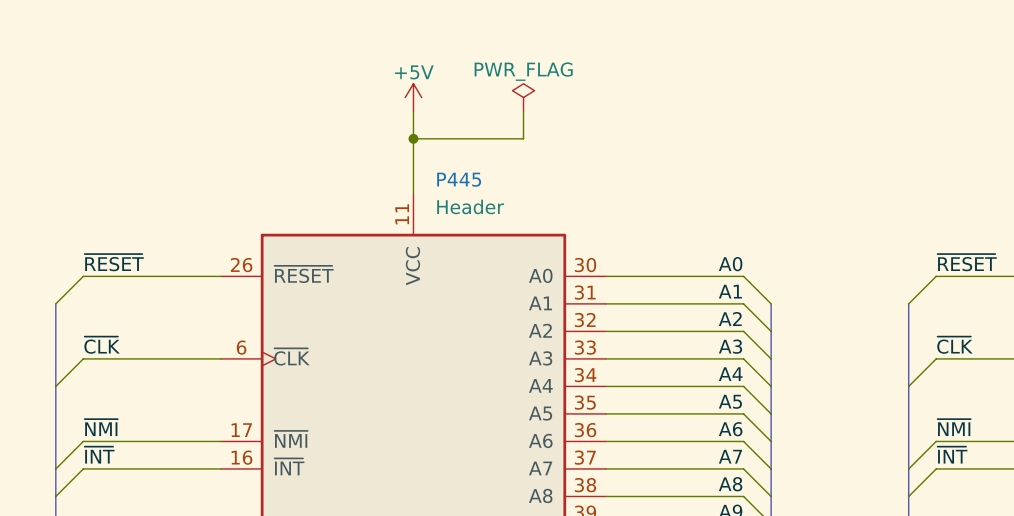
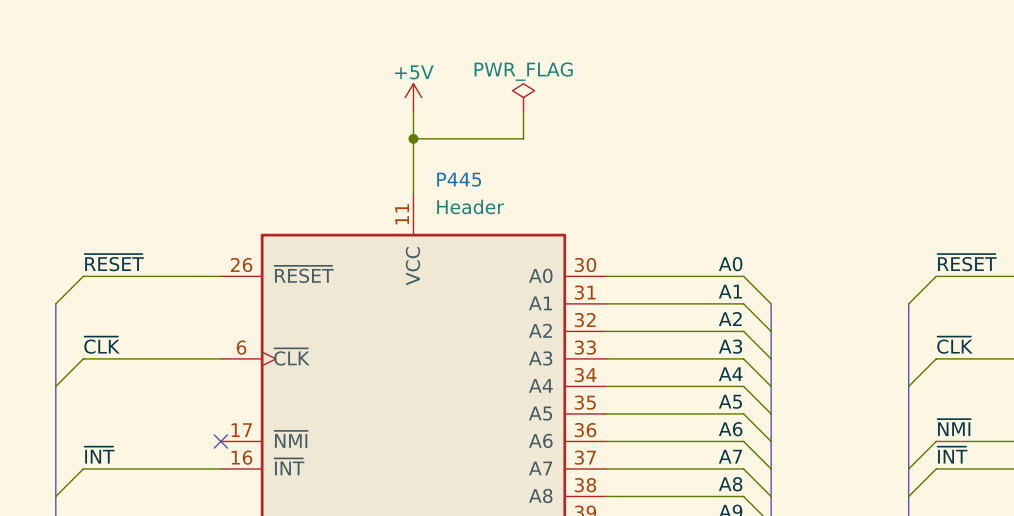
label: ~{NMI} (101, 427) -> none
wire: (220, 441) (83, 441) (55, 468) -> none
no-connect mark: none -> (220, 441)

